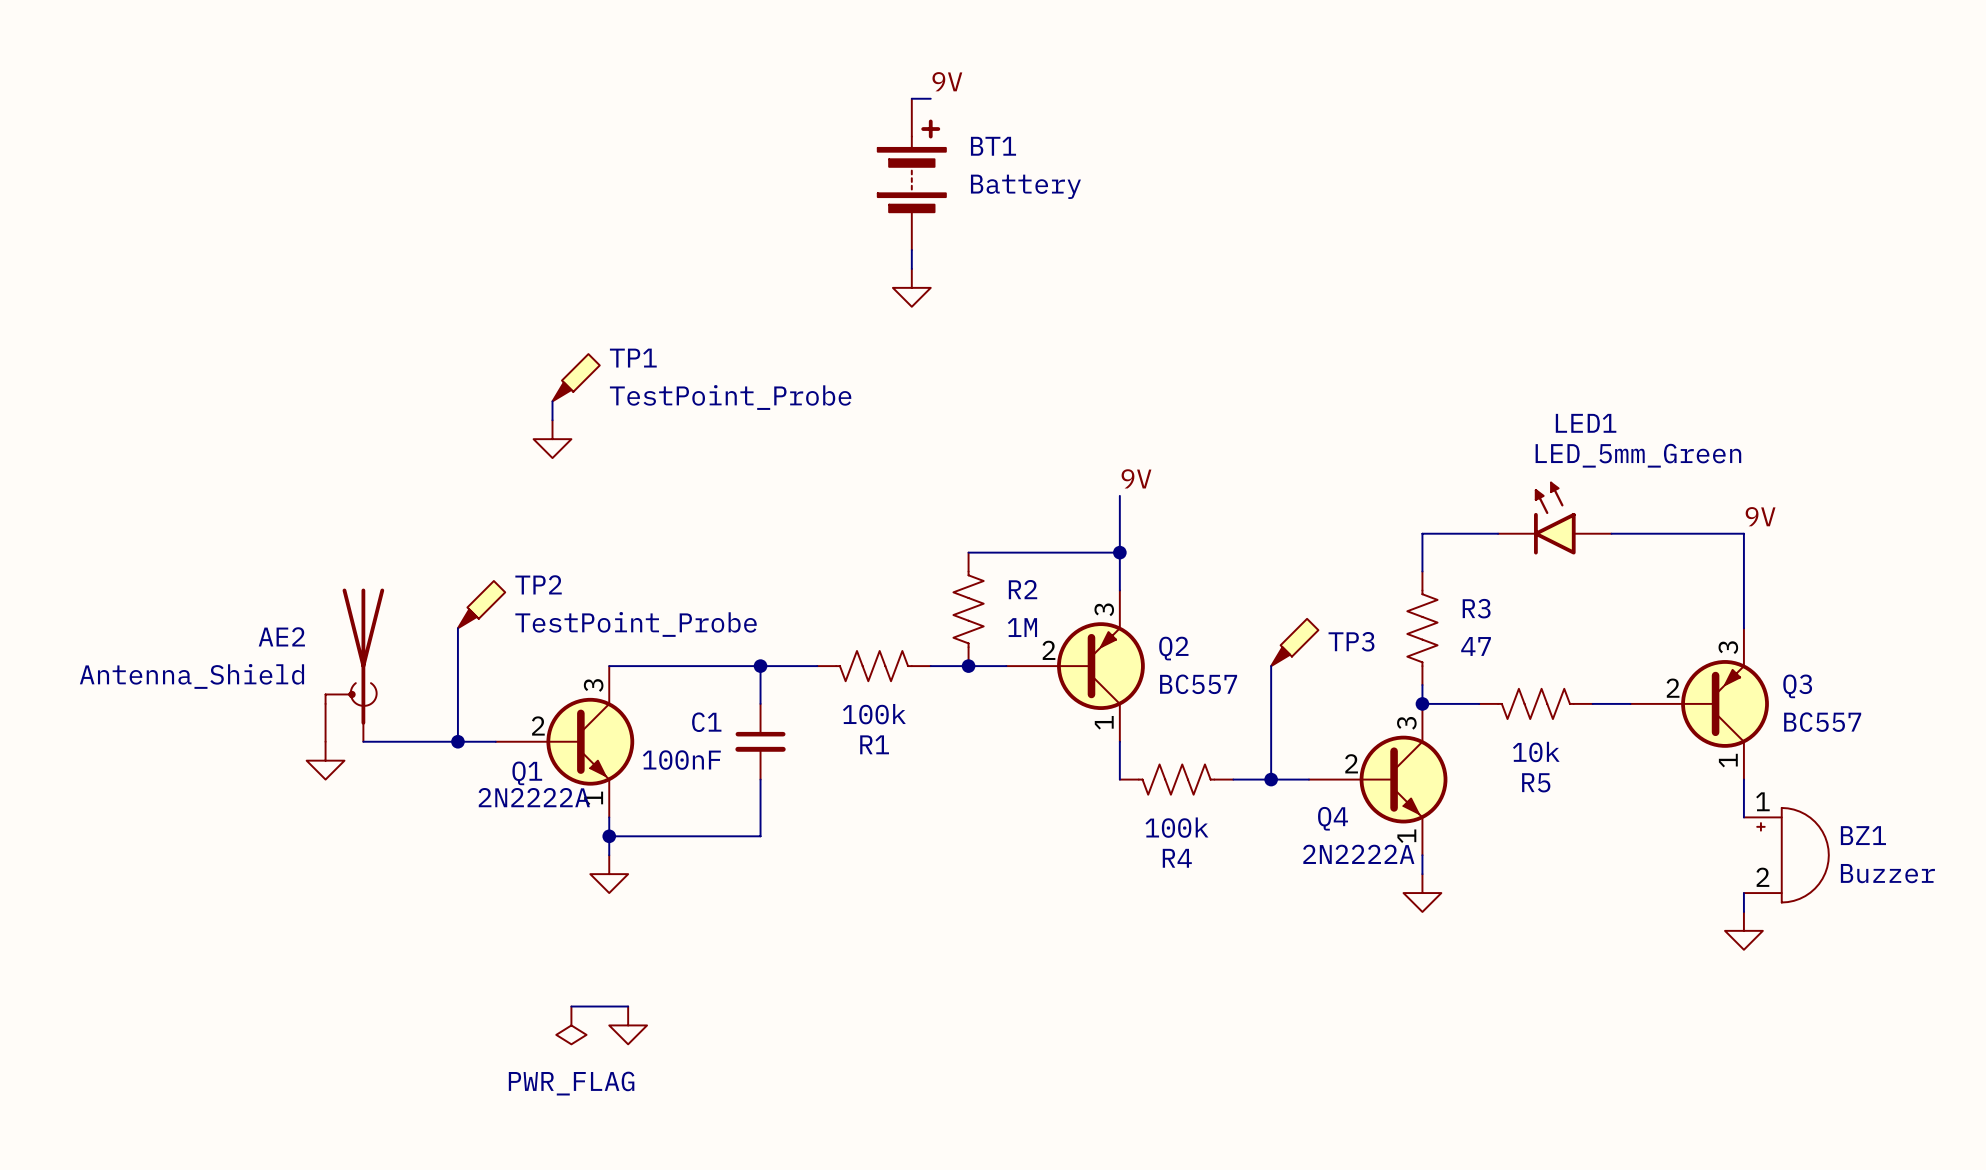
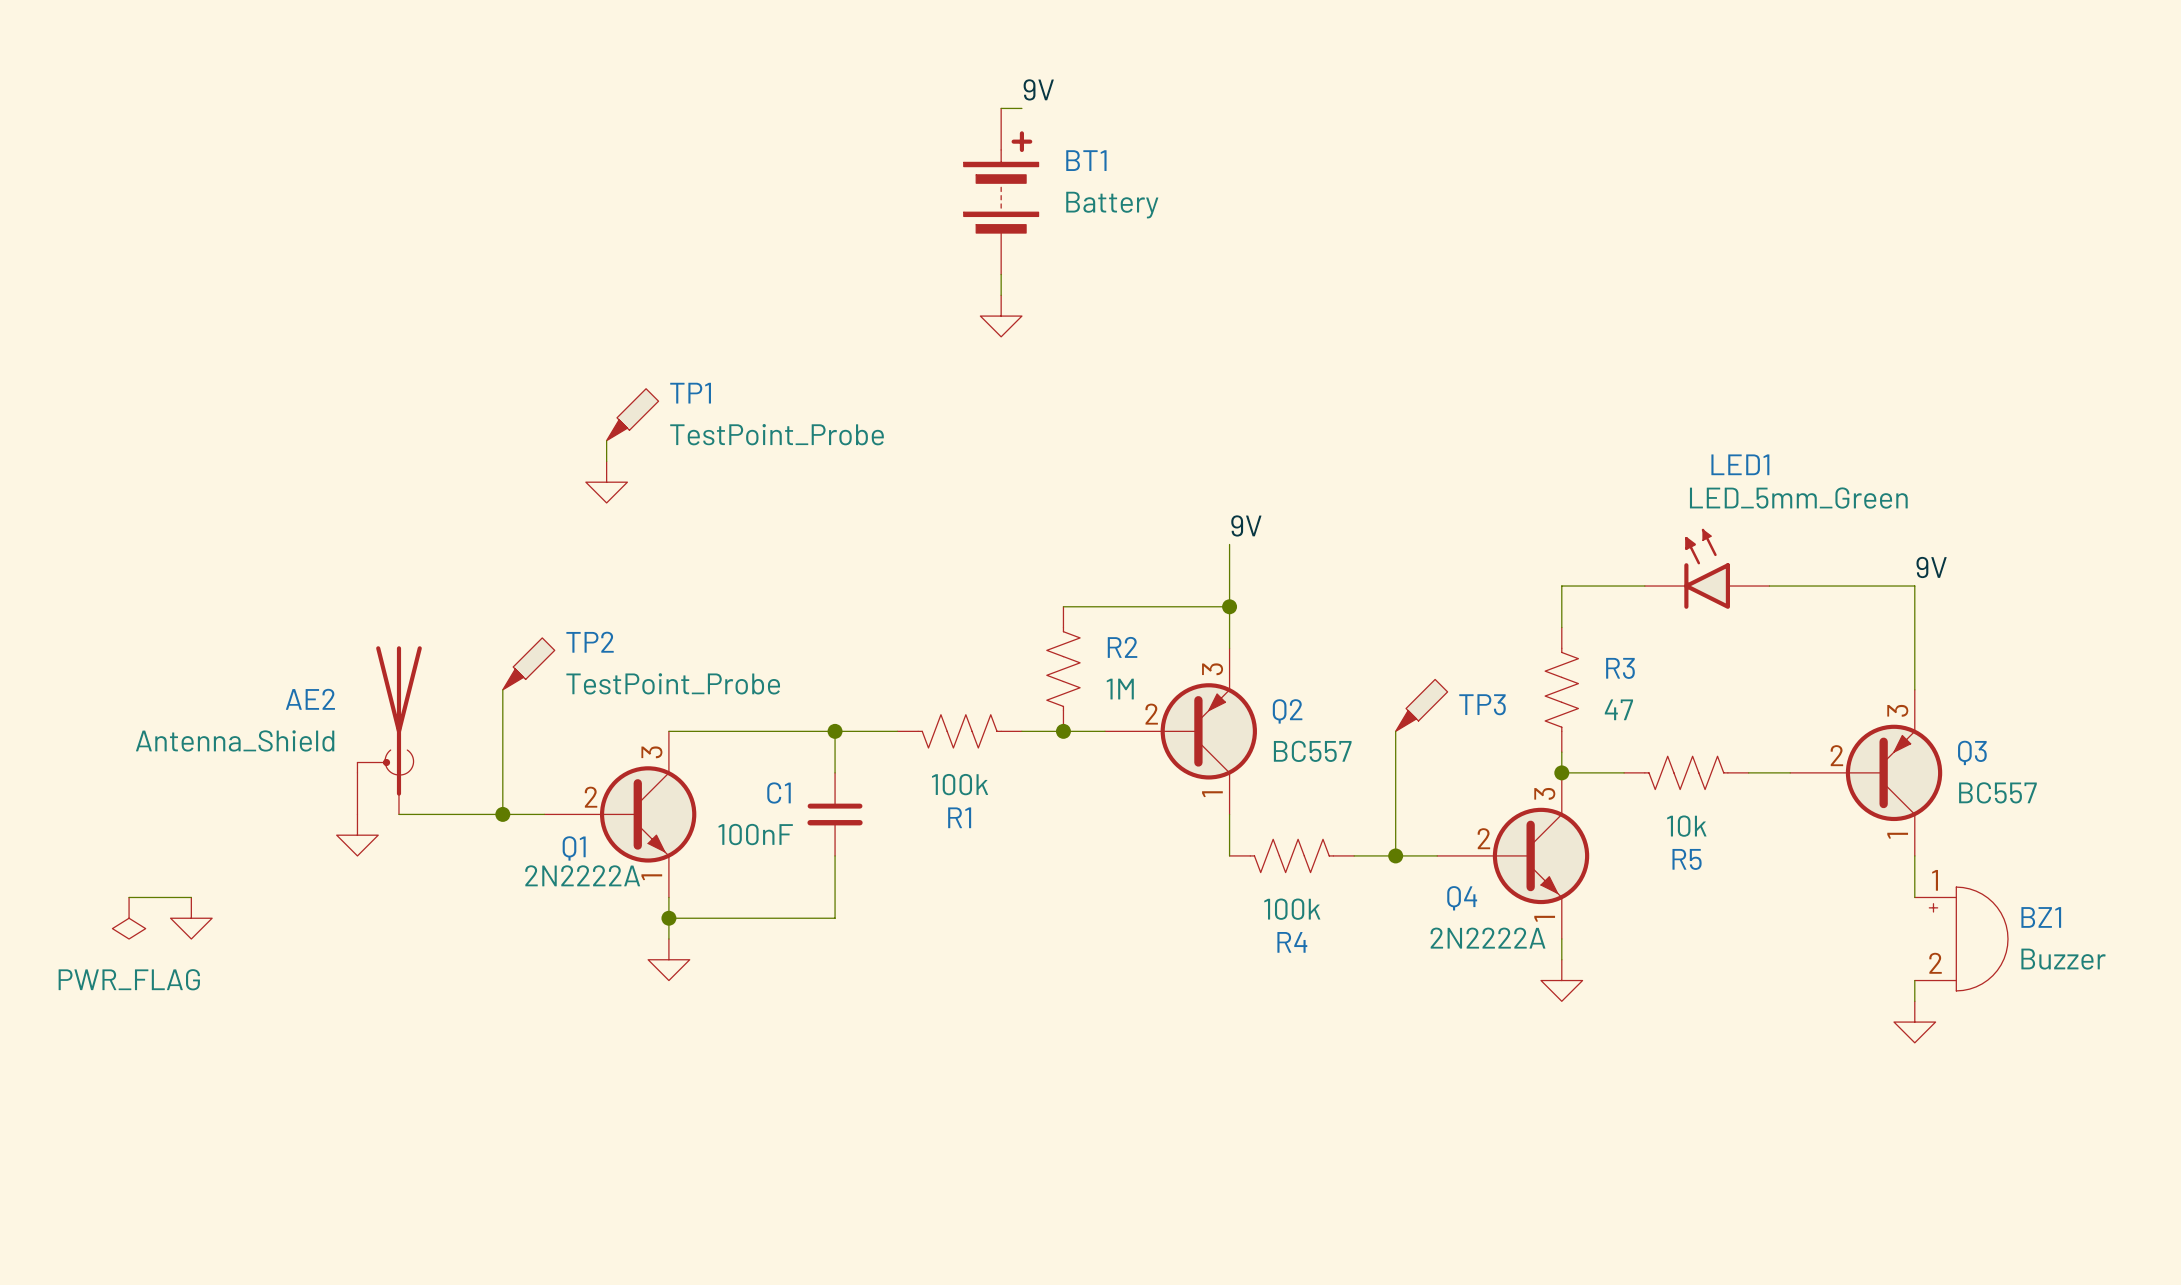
wire: none -> (129, 897) (191, 897)
power symbol: none -> PWR_FLAG (129, 918)
power symbol: none -> (191, 918)
wire: (571, 1006) (628, 1006) -> none
power symbol: PWR_FLAG (571, 1025) -> none
power symbol: (628, 1025) -> none

